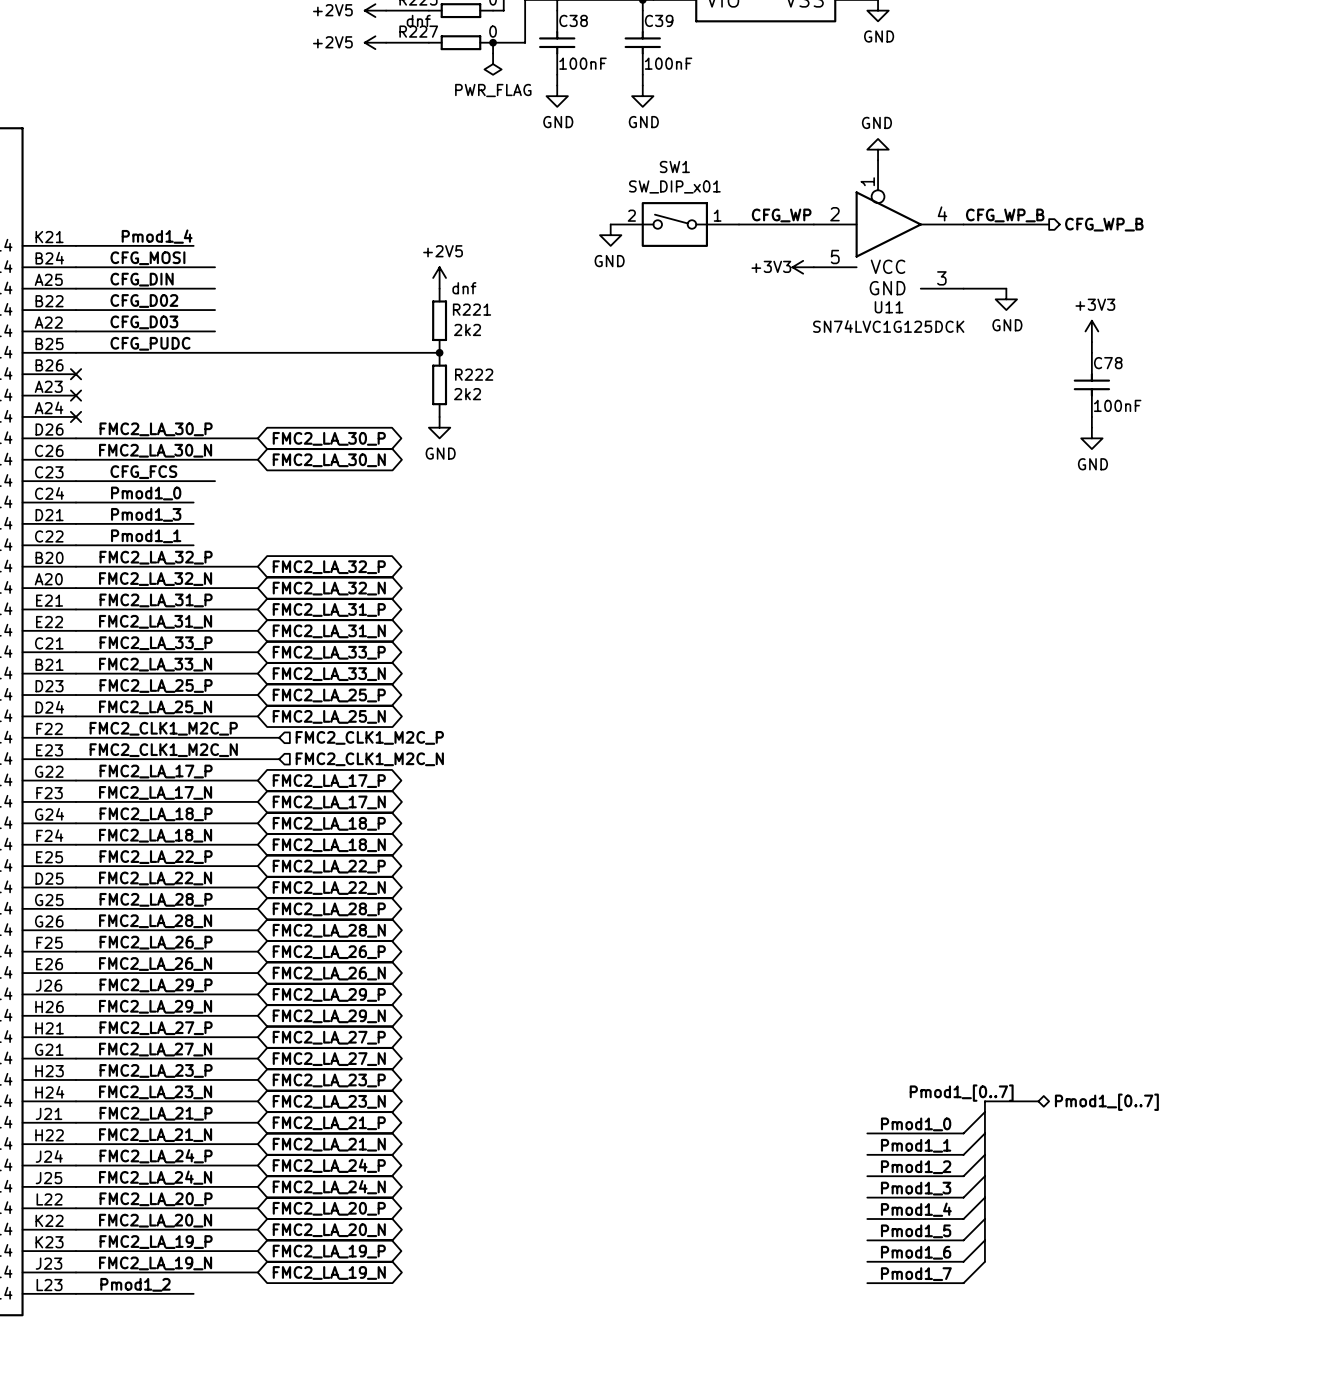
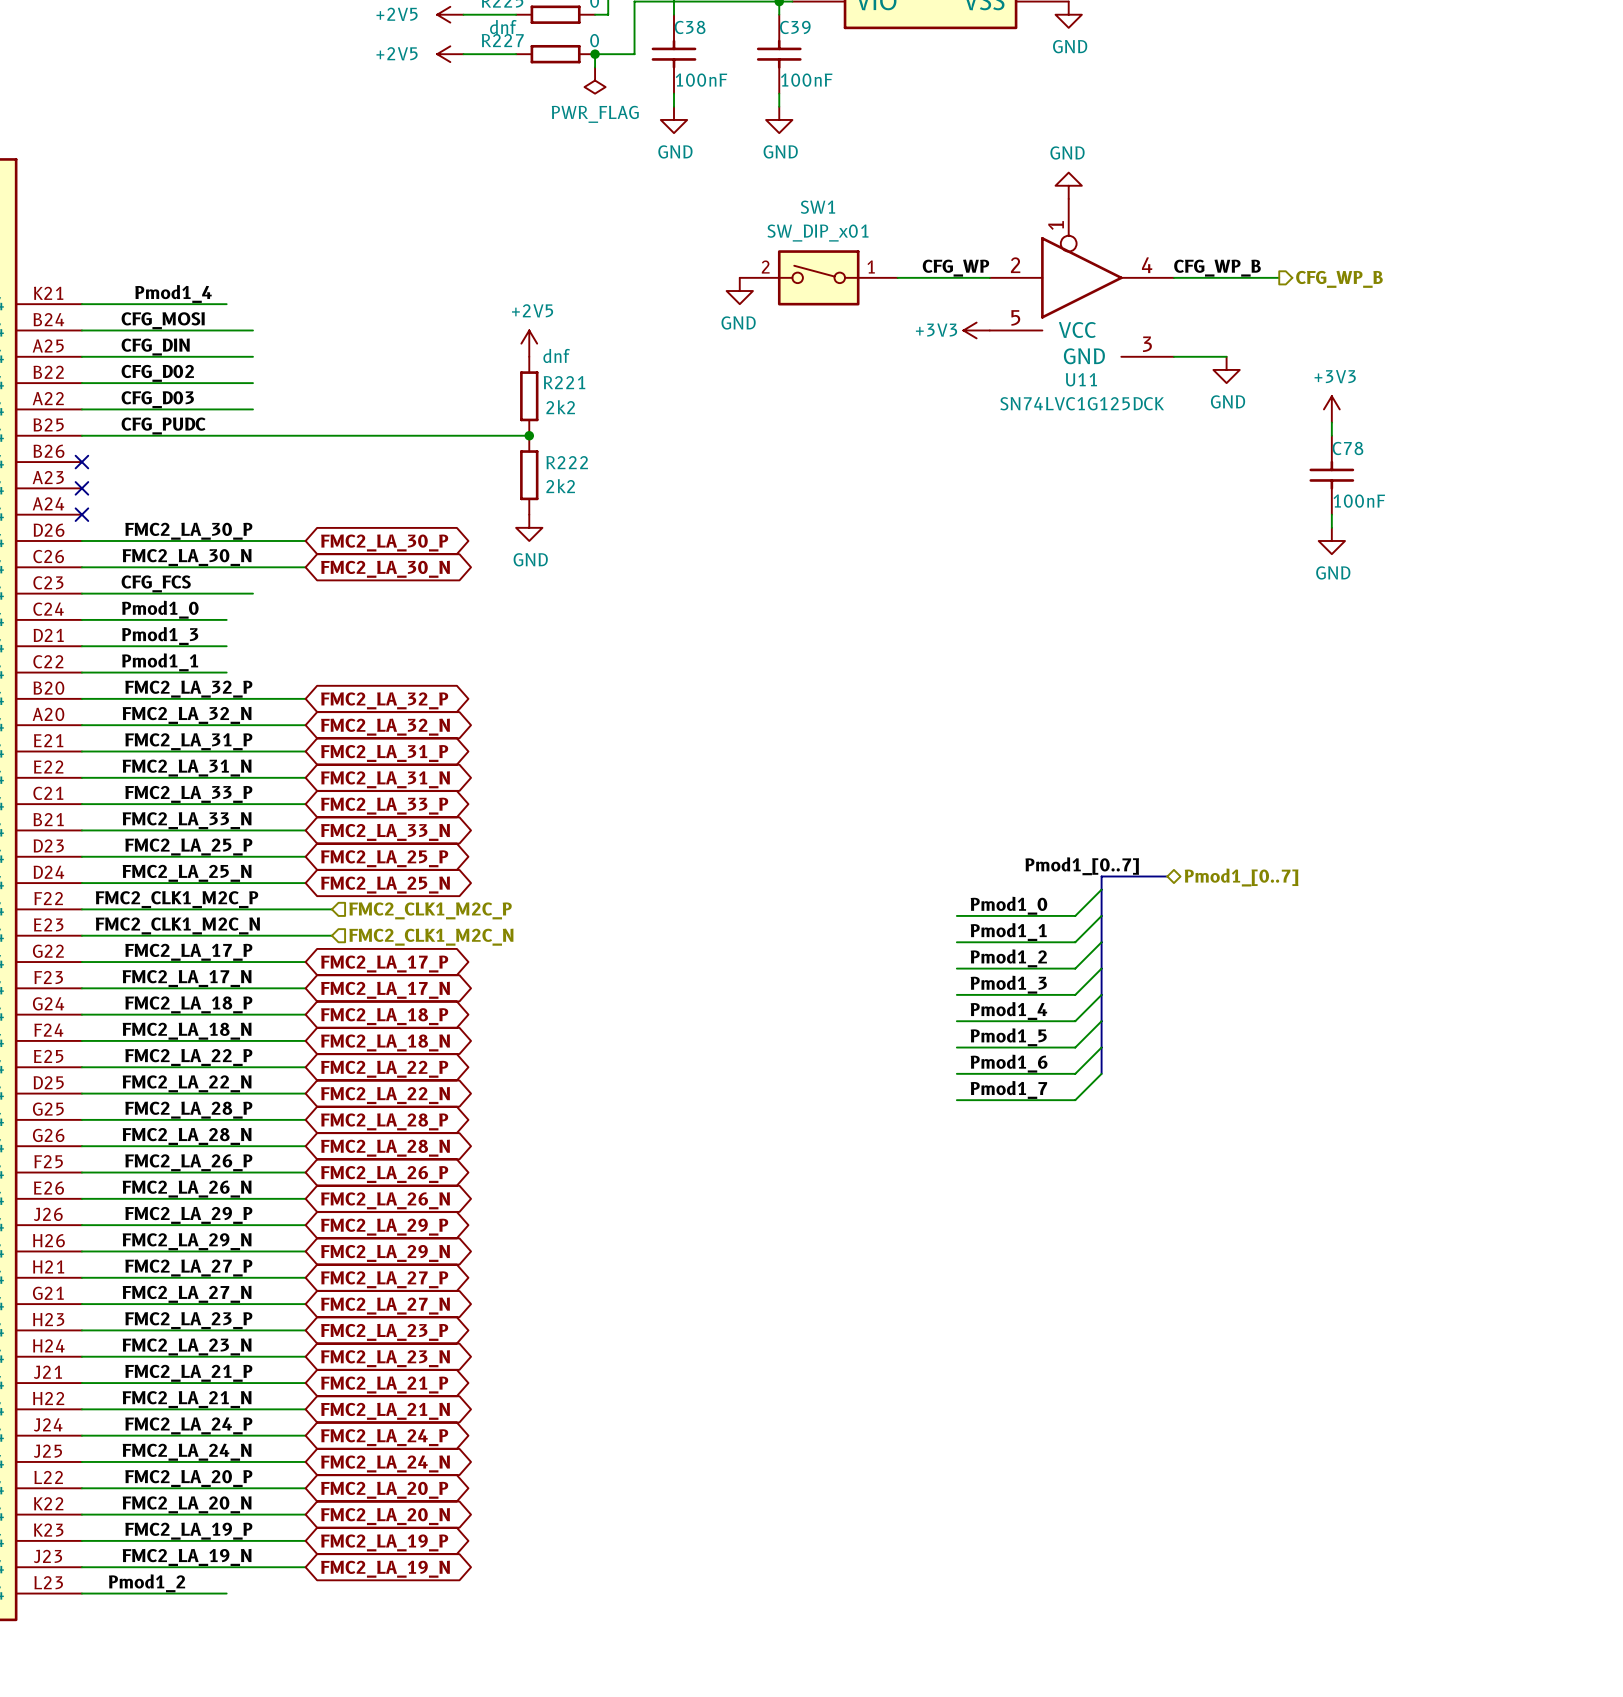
label: none -> Pmod1_[0..7] (1082, 866)
bus: none -> (1167, 876) (1101, 876) (1101, 1073)
hierarchical label: none -> Pmod1_[0..7] (1241, 877)
wire: none -> (1101, 889) (1075, 915) (956, 915)
label: none -> Pmod1_0 (1008, 905)
wire: none -> (1101, 915) (1075, 942)
label: none -> Pmod1_1 (1008, 932)
wire: none -> (956, 942) (1075, 942)
wire: none -> (1101, 942) (1075, 968) (956, 968)
label: none -> Pmod1_2 (1008, 958)
wire: none -> (1101, 968) (1075, 994) (956, 994)
label: none -> Pmod1_3 (1008, 984)
wire: none -> (1101, 994) (1075, 1021)
label: none -> Pmod1_4 (1008, 1010)
wire: none -> (956, 1021) (1075, 1021)
wire: none -> (1101, 1021) (1075, 1047) (956, 1047)
label: none -> Pmod1_5 (1008, 1037)
wire: none -> (1101, 1047) (1075, 1073) (956, 1073)
label: none -> Pmod1_6 (1009, 1063)
wire: none -> (1101, 1073) (1075, 1100) (956, 1100)
label: none -> Pmod1_7 (1008, 1089)
label: Pmod1_[0..7] (961, 1093) -> none
bus: (1038, 1101) (984, 1101) (984, 1261) -> none
hierarchical label: Pmod1_[0..7] (1106, 1102) -> none
wire: (984, 1112) (963, 1133) (867, 1133) -> none
label: Pmod1_0 (916, 1124) -> none
wire: (984, 1133) (963, 1154) (867, 1154) -> none
label: Pmod1_1 (916, 1145) -> none
wire: (984, 1154) (963, 1176) (867, 1176) -> none
label: Pmod1_2 (916, 1167) -> none
wire: (984, 1176) (963, 1197) (867, 1197) -> none
label: Pmod1_3 (916, 1188) -> none
wire: (984, 1197) (963, 1219) (867, 1219) -> none
label: Pmod1_4 (916, 1209) -> none
wire: (984, 1219) (963, 1240) (867, 1240) -> none
label: Pmod1_5 (916, 1231) -> none
wire: (984, 1240) (963, 1261) (867, 1261) -> none
label: Pmod1_6 (916, 1252) -> none
wire: (984, 1261) (963, 1283) (867, 1283) -> none
label: Pmod1_7 (916, 1274) -> none

